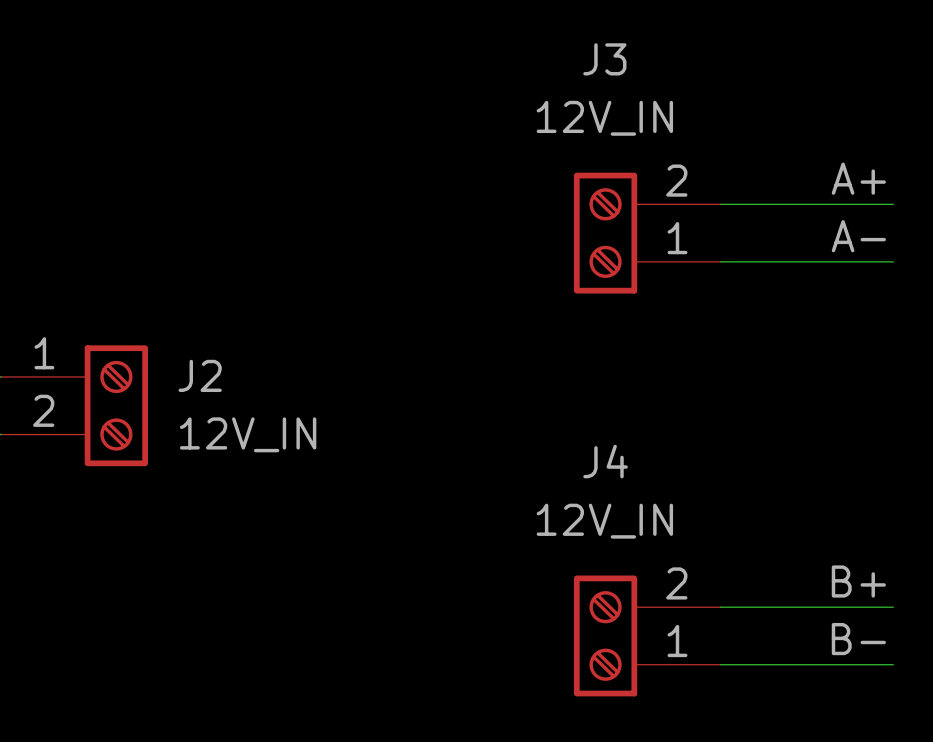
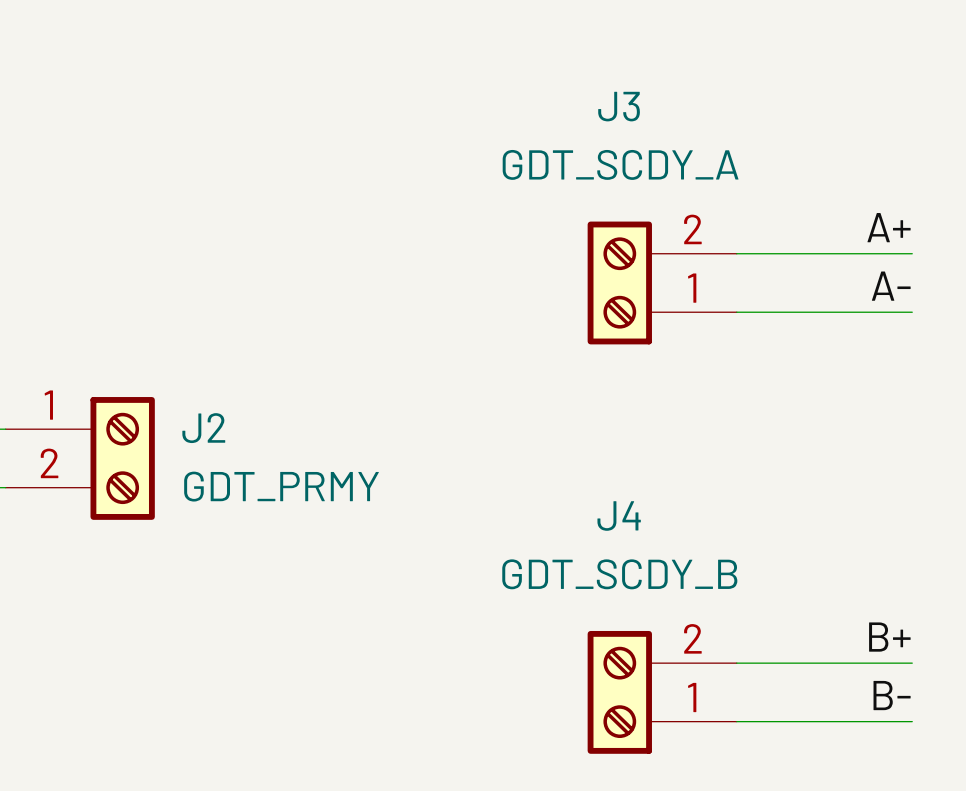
J3 value: 12V_IN (604, 118) -> GDT_SCDY_A (620, 164)
J2 value: 12V_IN (248, 434) -> GDT_PRMY (281, 486)
J4 value: 12V_IN (604, 521) -> GDT_SCDY_B (619, 574)

